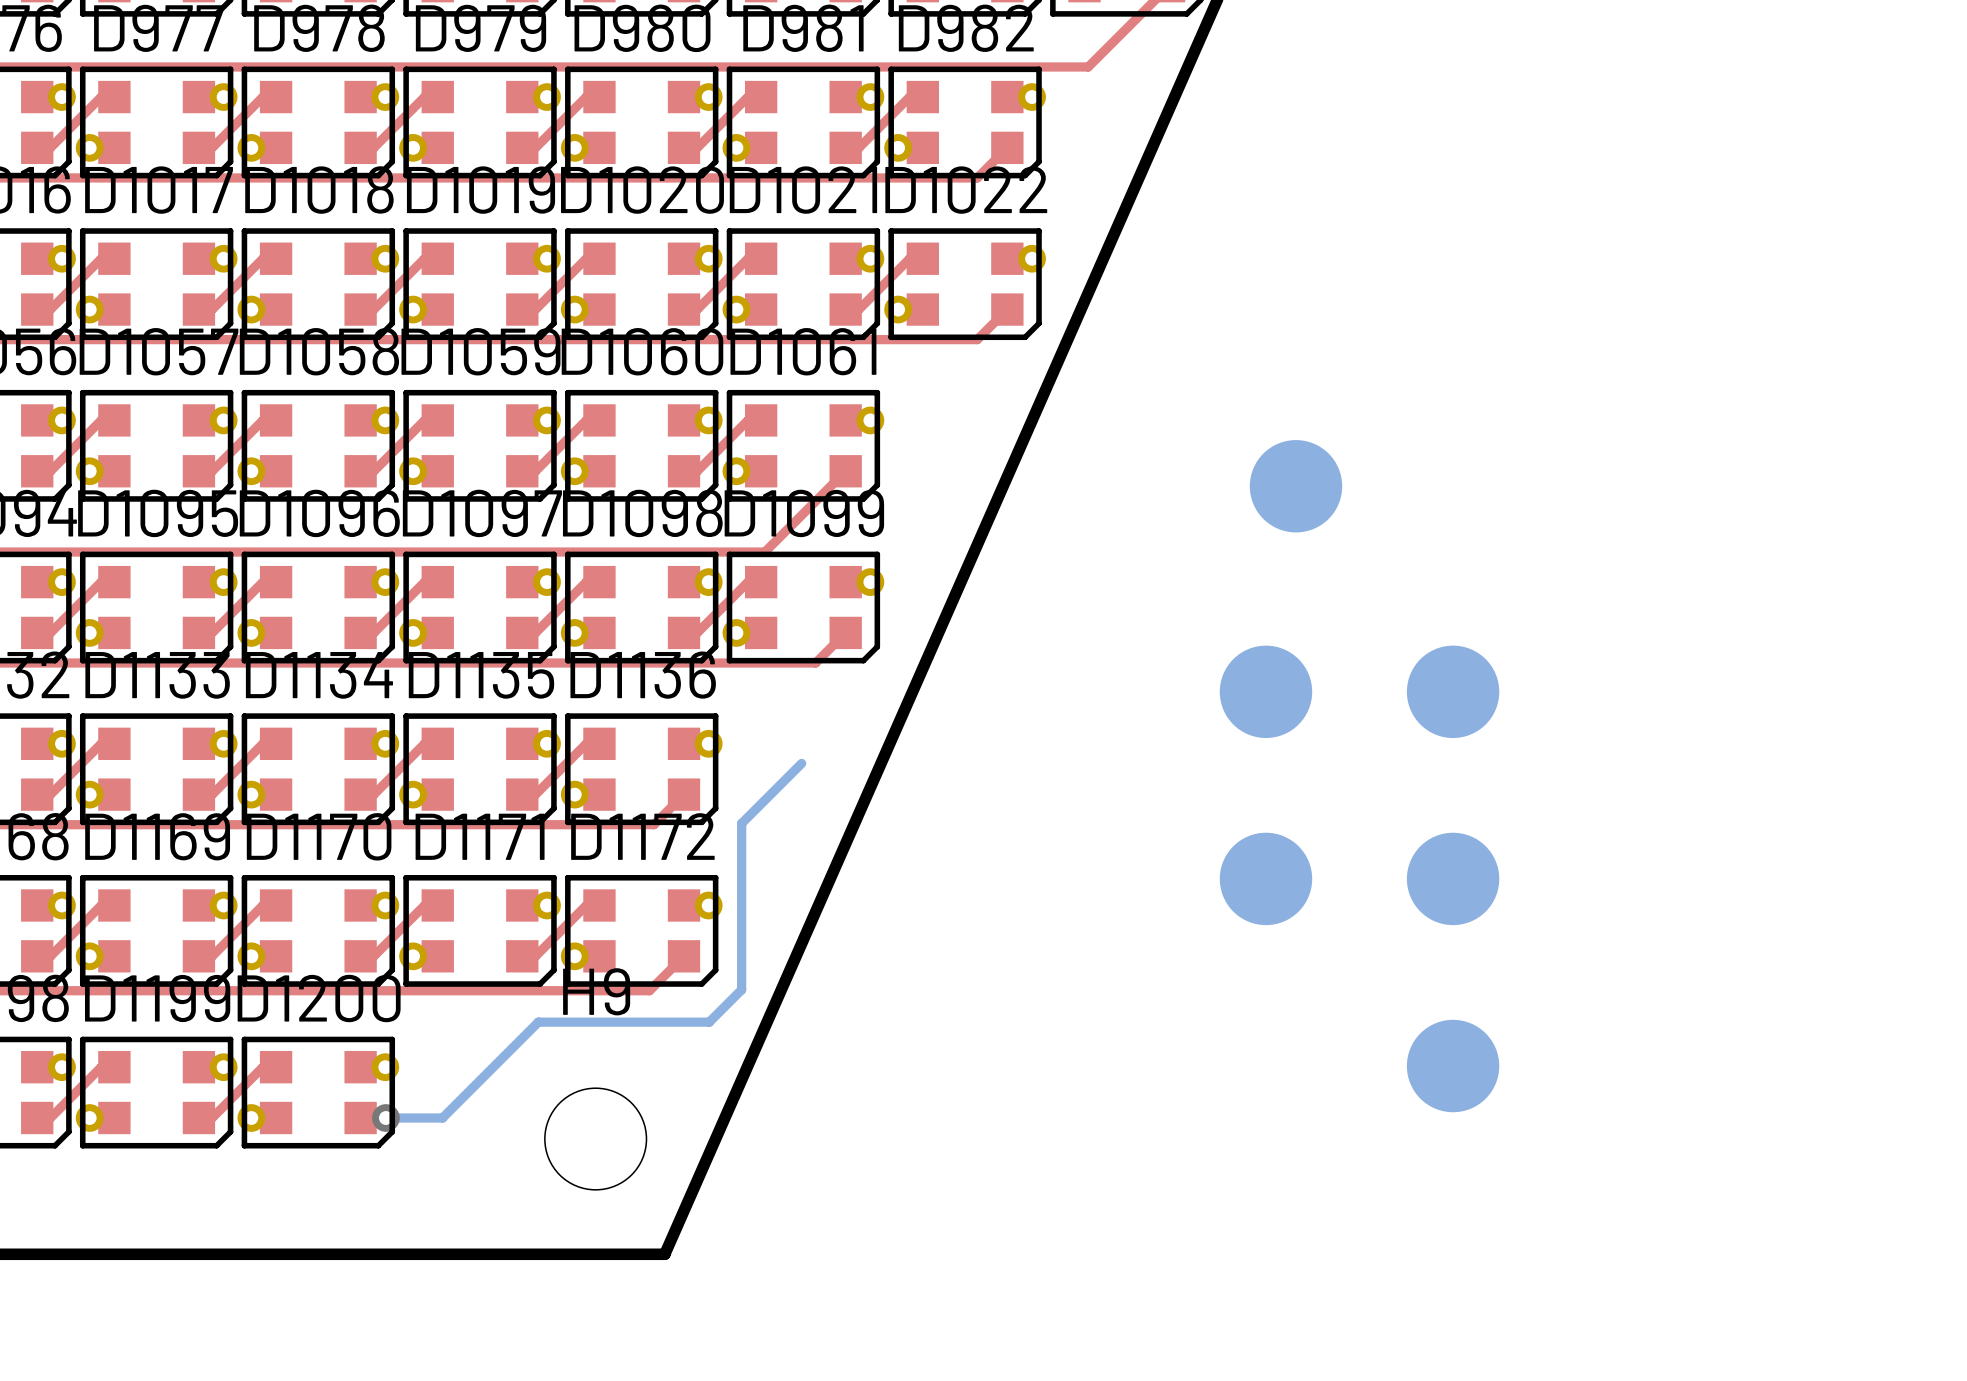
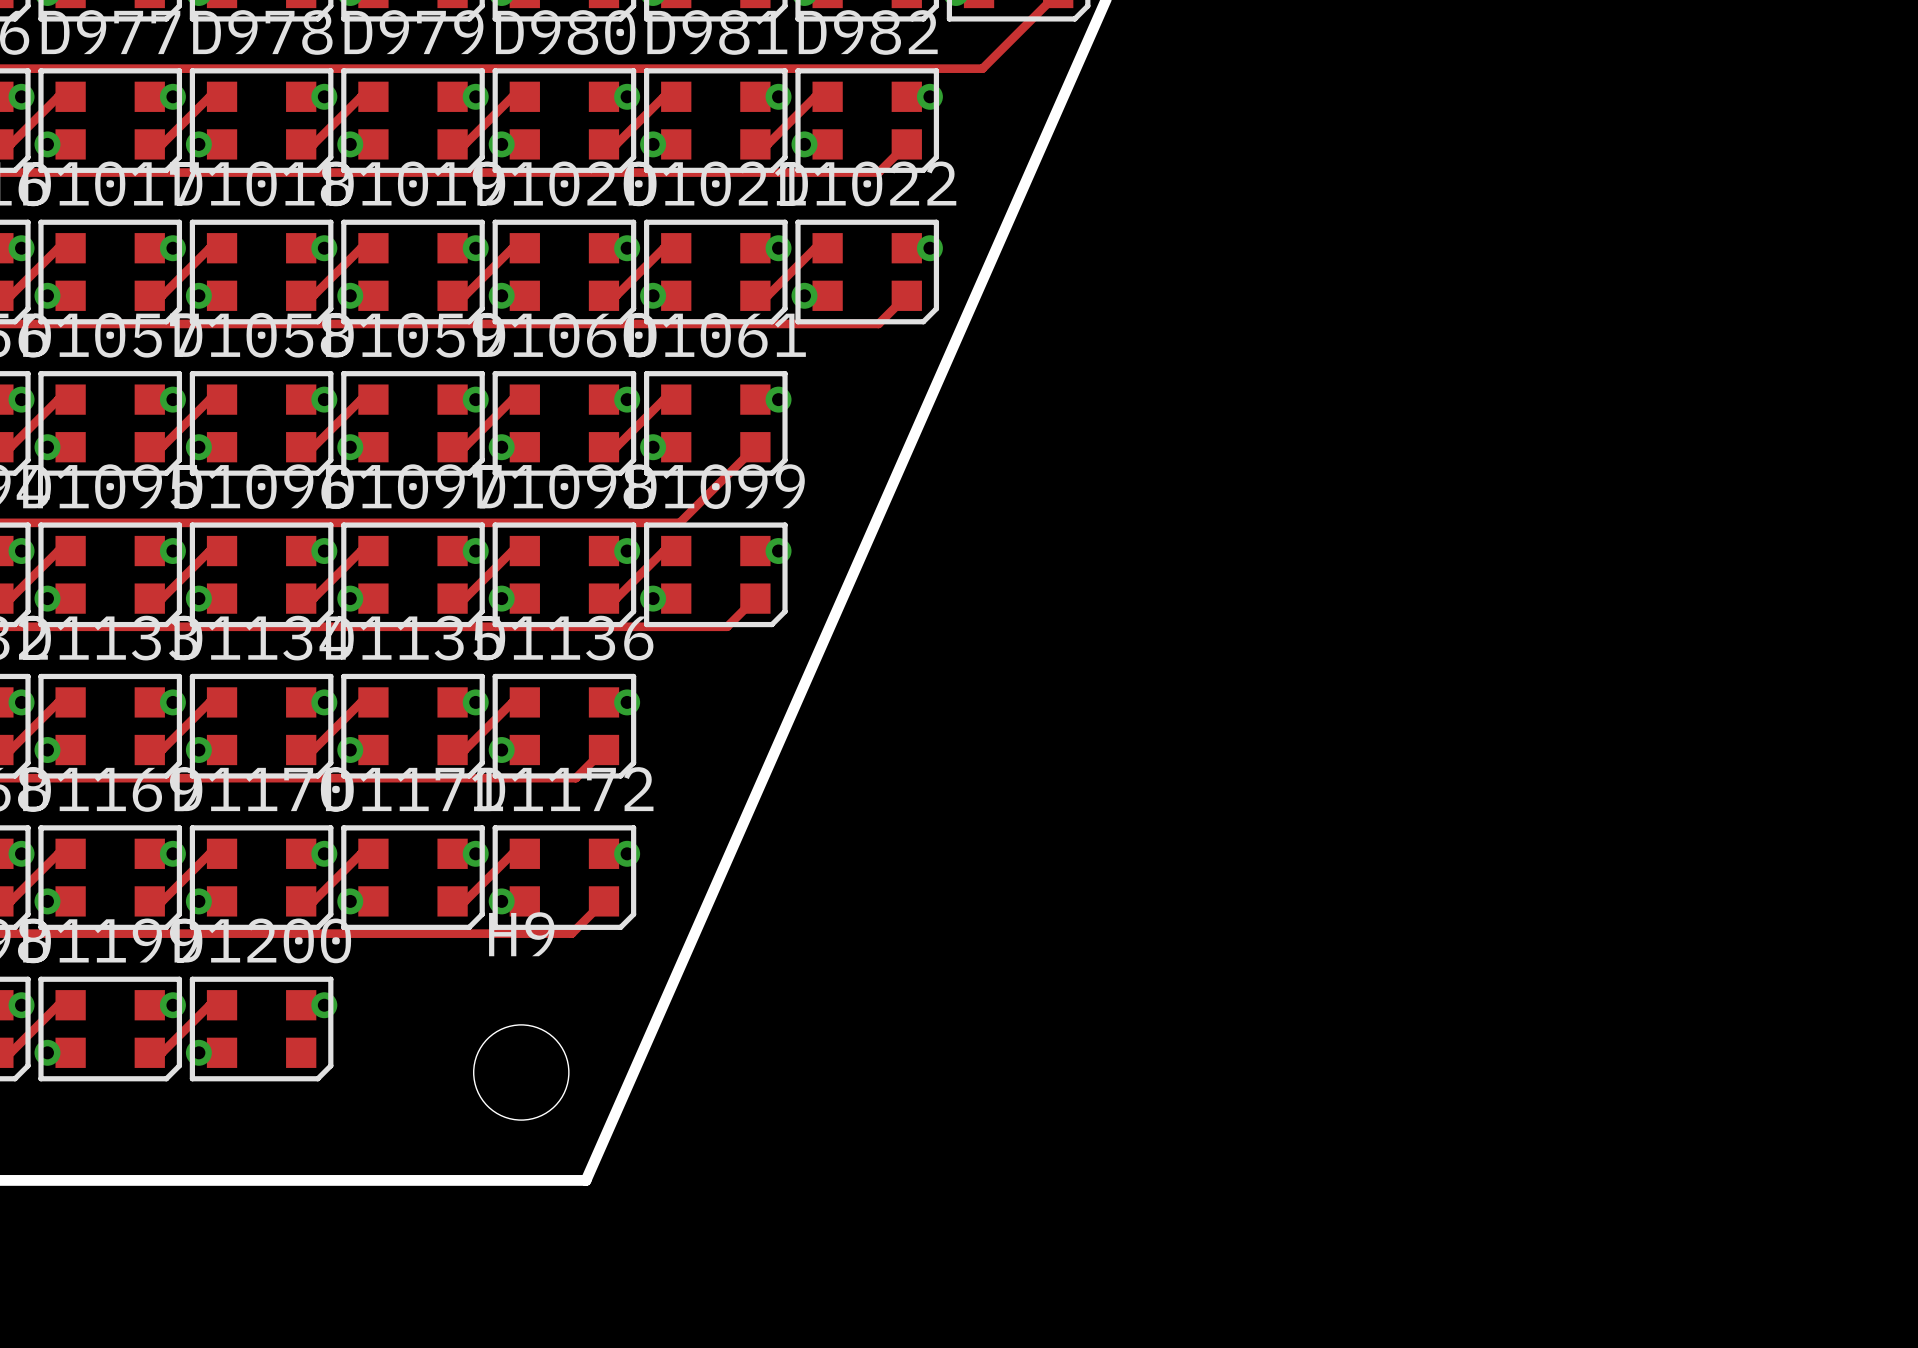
part: (1296, 486) -> none
part: (1265, 691) -> none
part: (1453, 691) -> none
bottom track: (801, 763) (741, 823) (741, 989) (709, 1022) (538, 1022) (442, 1118) (385, 1118) -> none
part: (1265, 878) -> none
part: (1453, 878) -> none
part: (1453, 1066) -> none
via: (385, 1118) -> none

